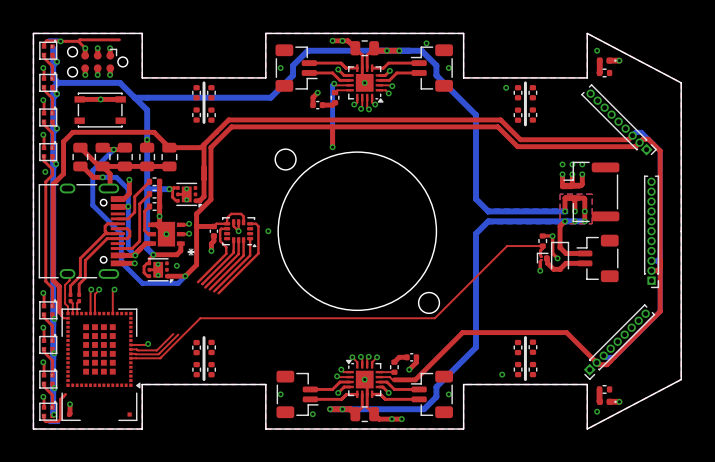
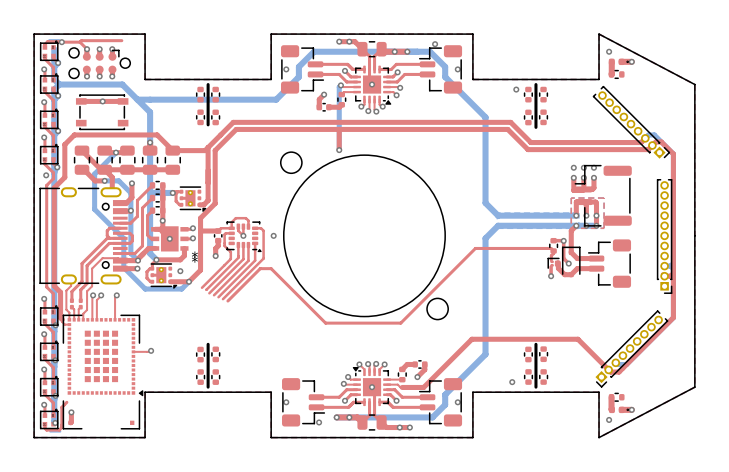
top track: (542, 246) (507, 246) (434, 318) (200, 318) (160, 358) (130, 358) -> (553, 250) (551, 248) (475, 248) (400, 323) (325, 323) (271, 268) (260, 268) (227, 301)
top track: none -> (120, 260) (117, 258) (102, 258) (92, 268) (92, 286) (87, 291) (87, 309) (83, 313) (83, 319)
top track: (173, 334) (156, 350) (130, 349) -> none
top track: (178, 334) (158, 354) (130, 353) -> none

